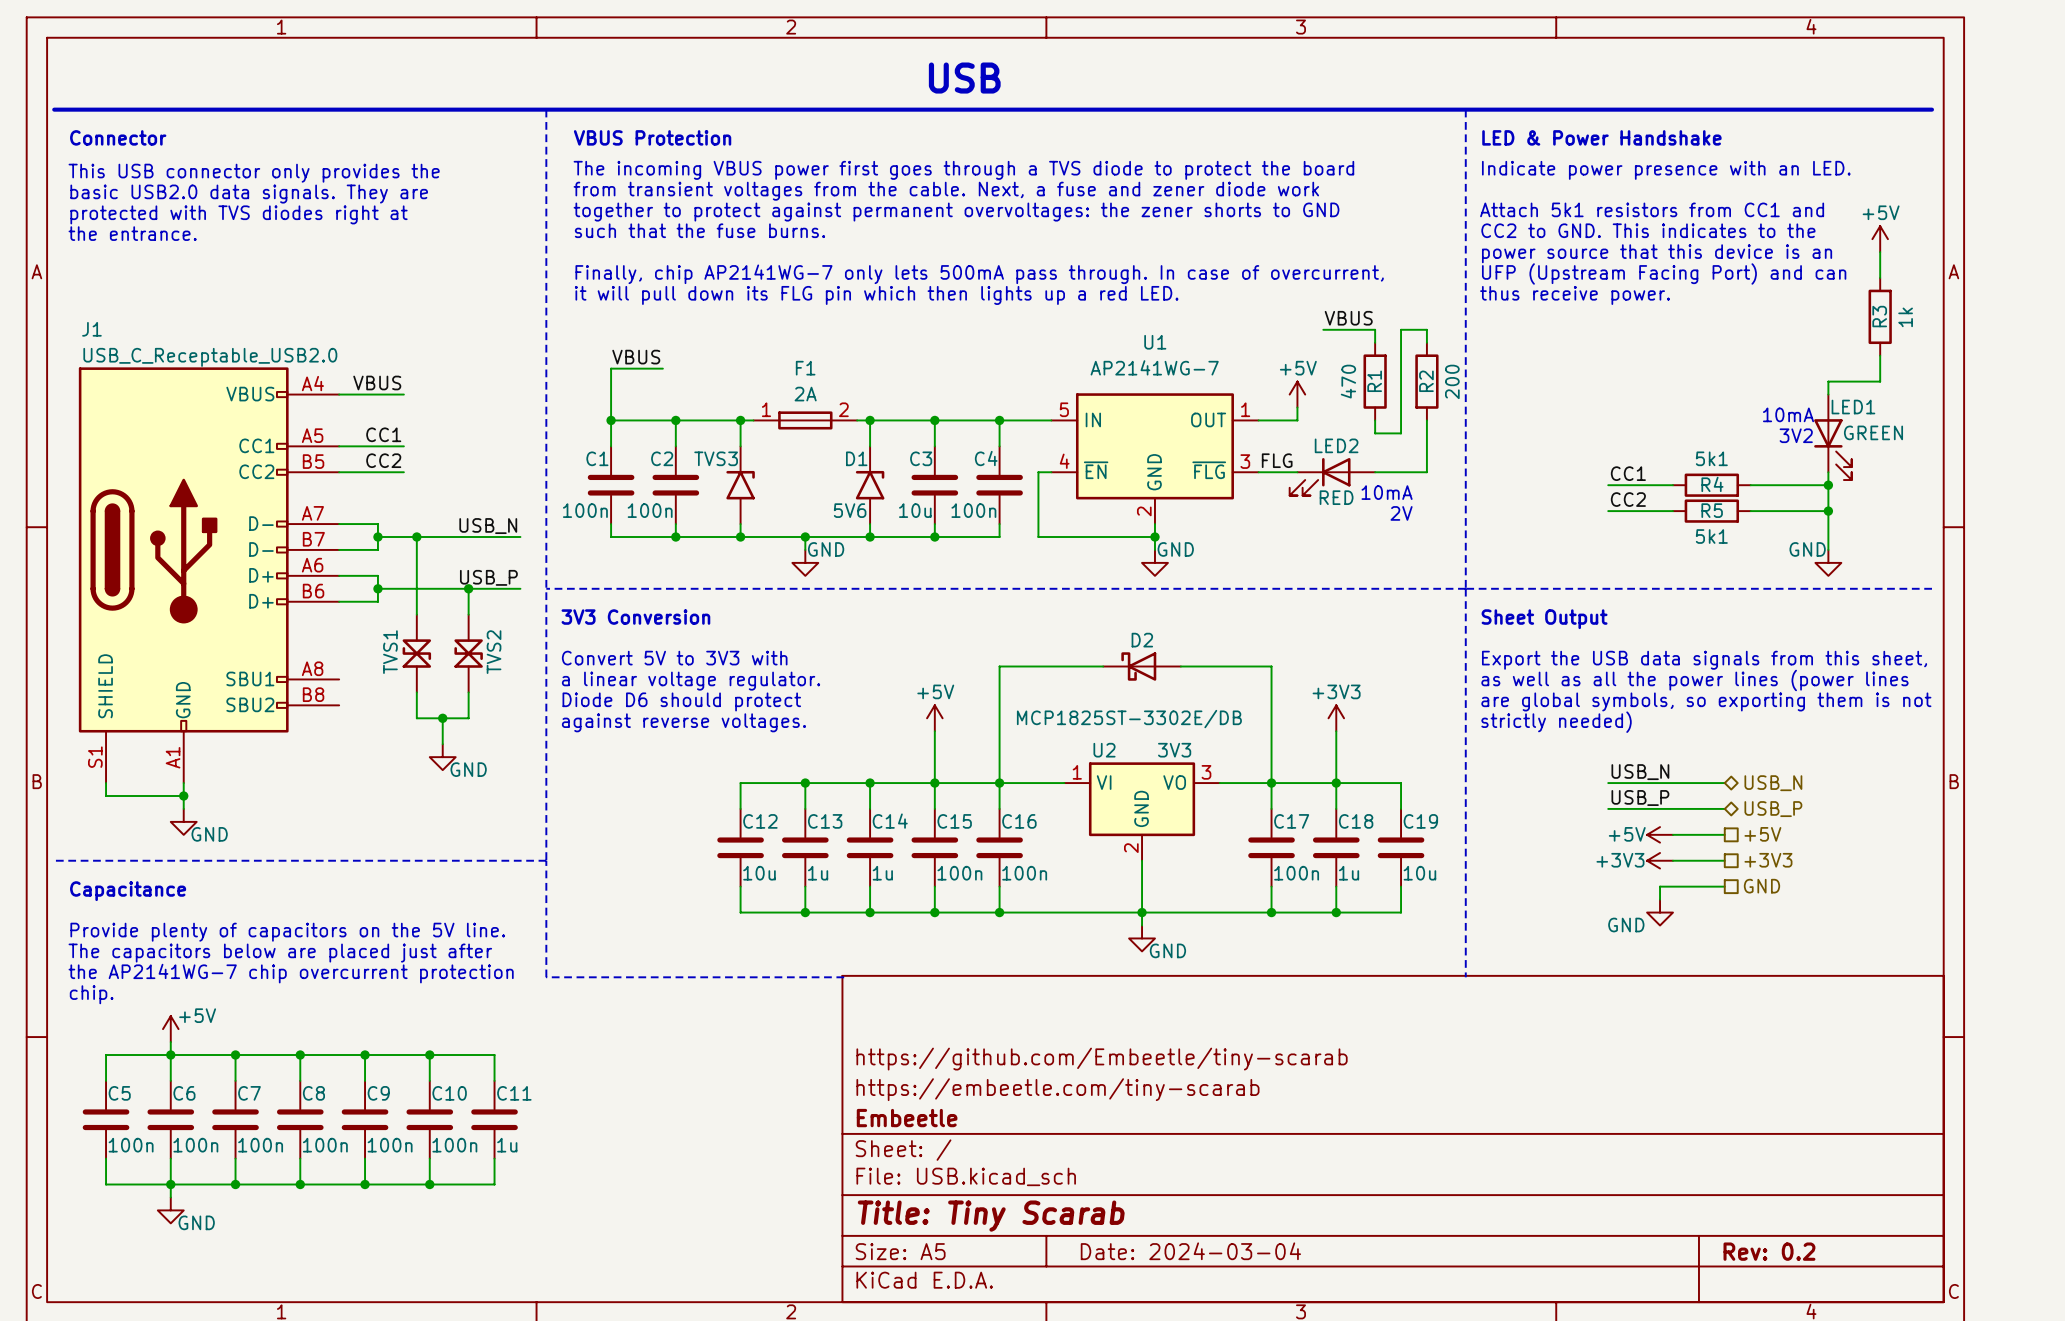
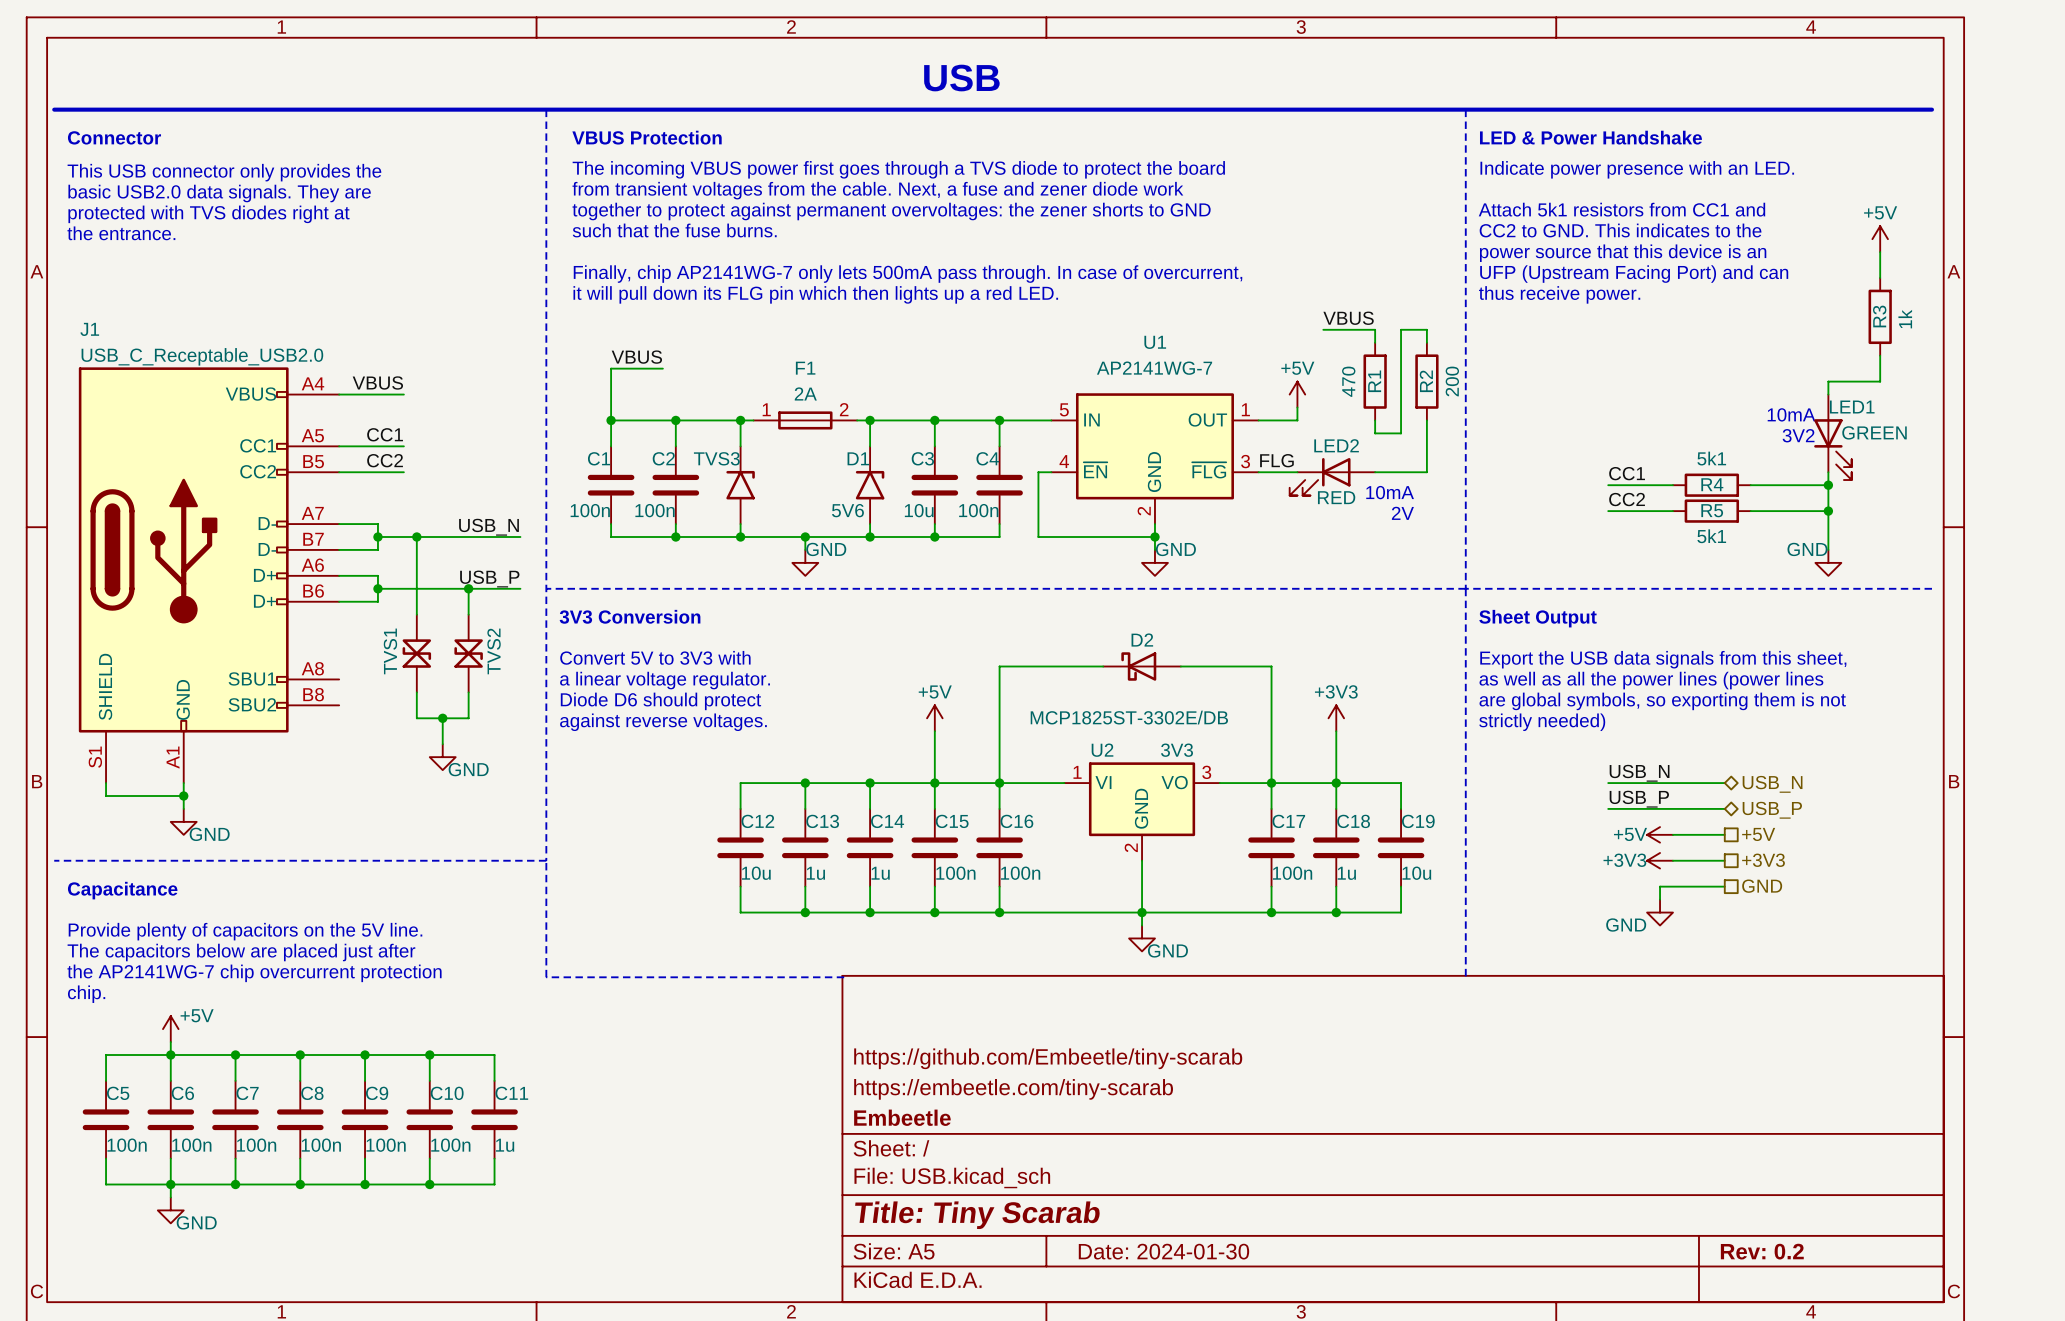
title block: Date: 2024-03-04 (1190, 1251) -> Date: 2024-01-30 (1163, 1251)

